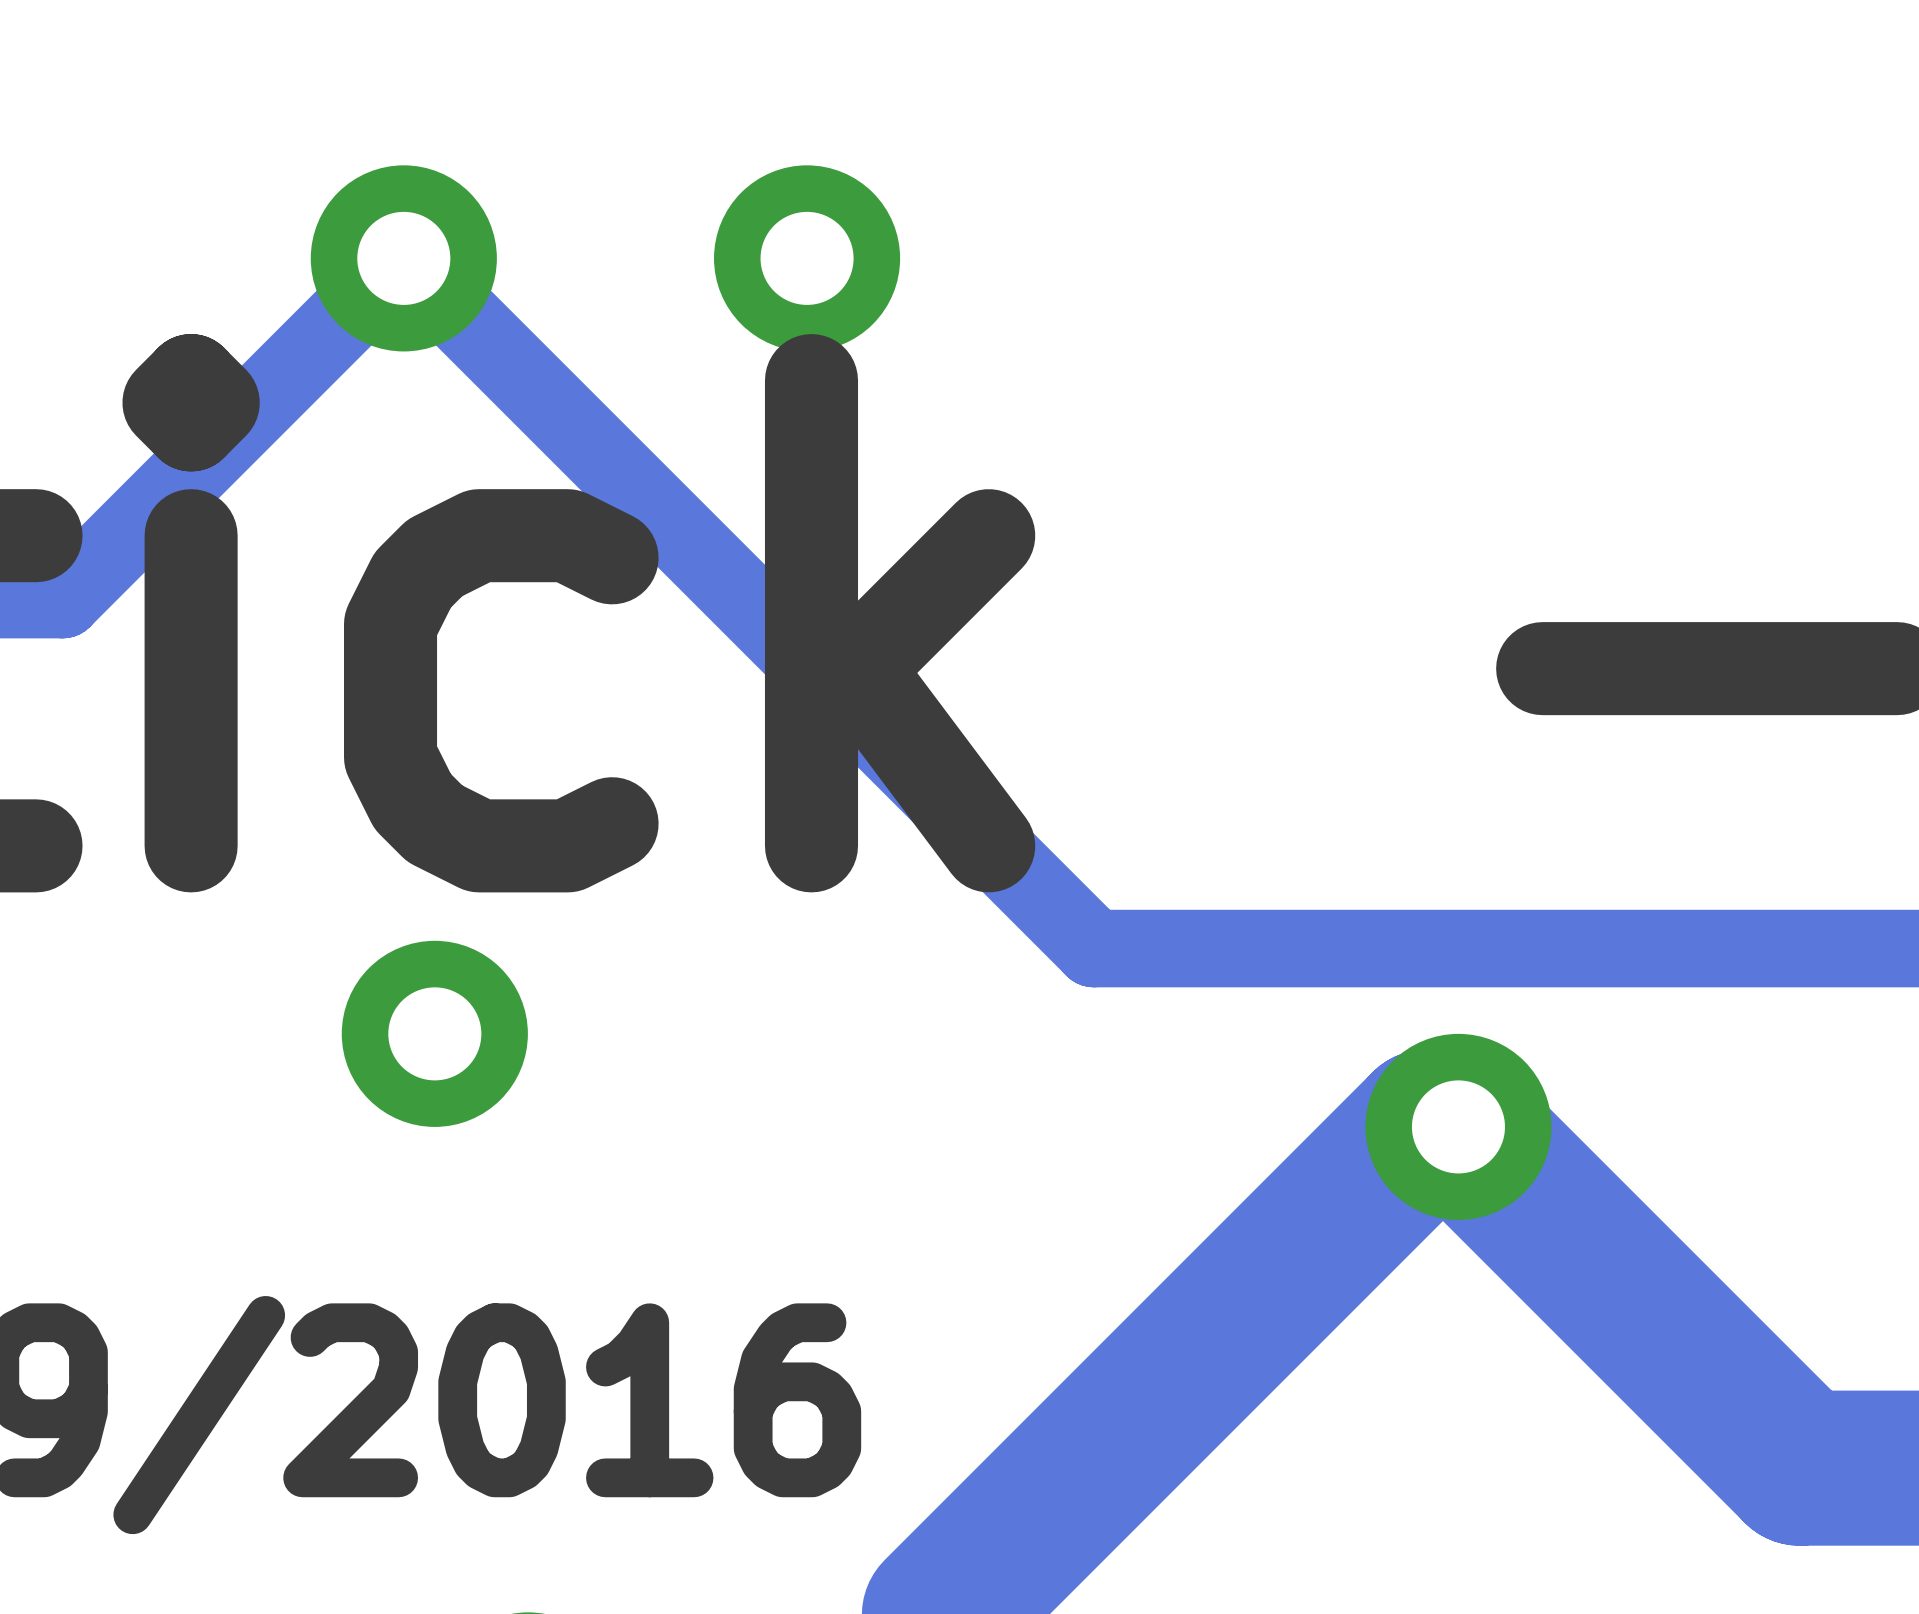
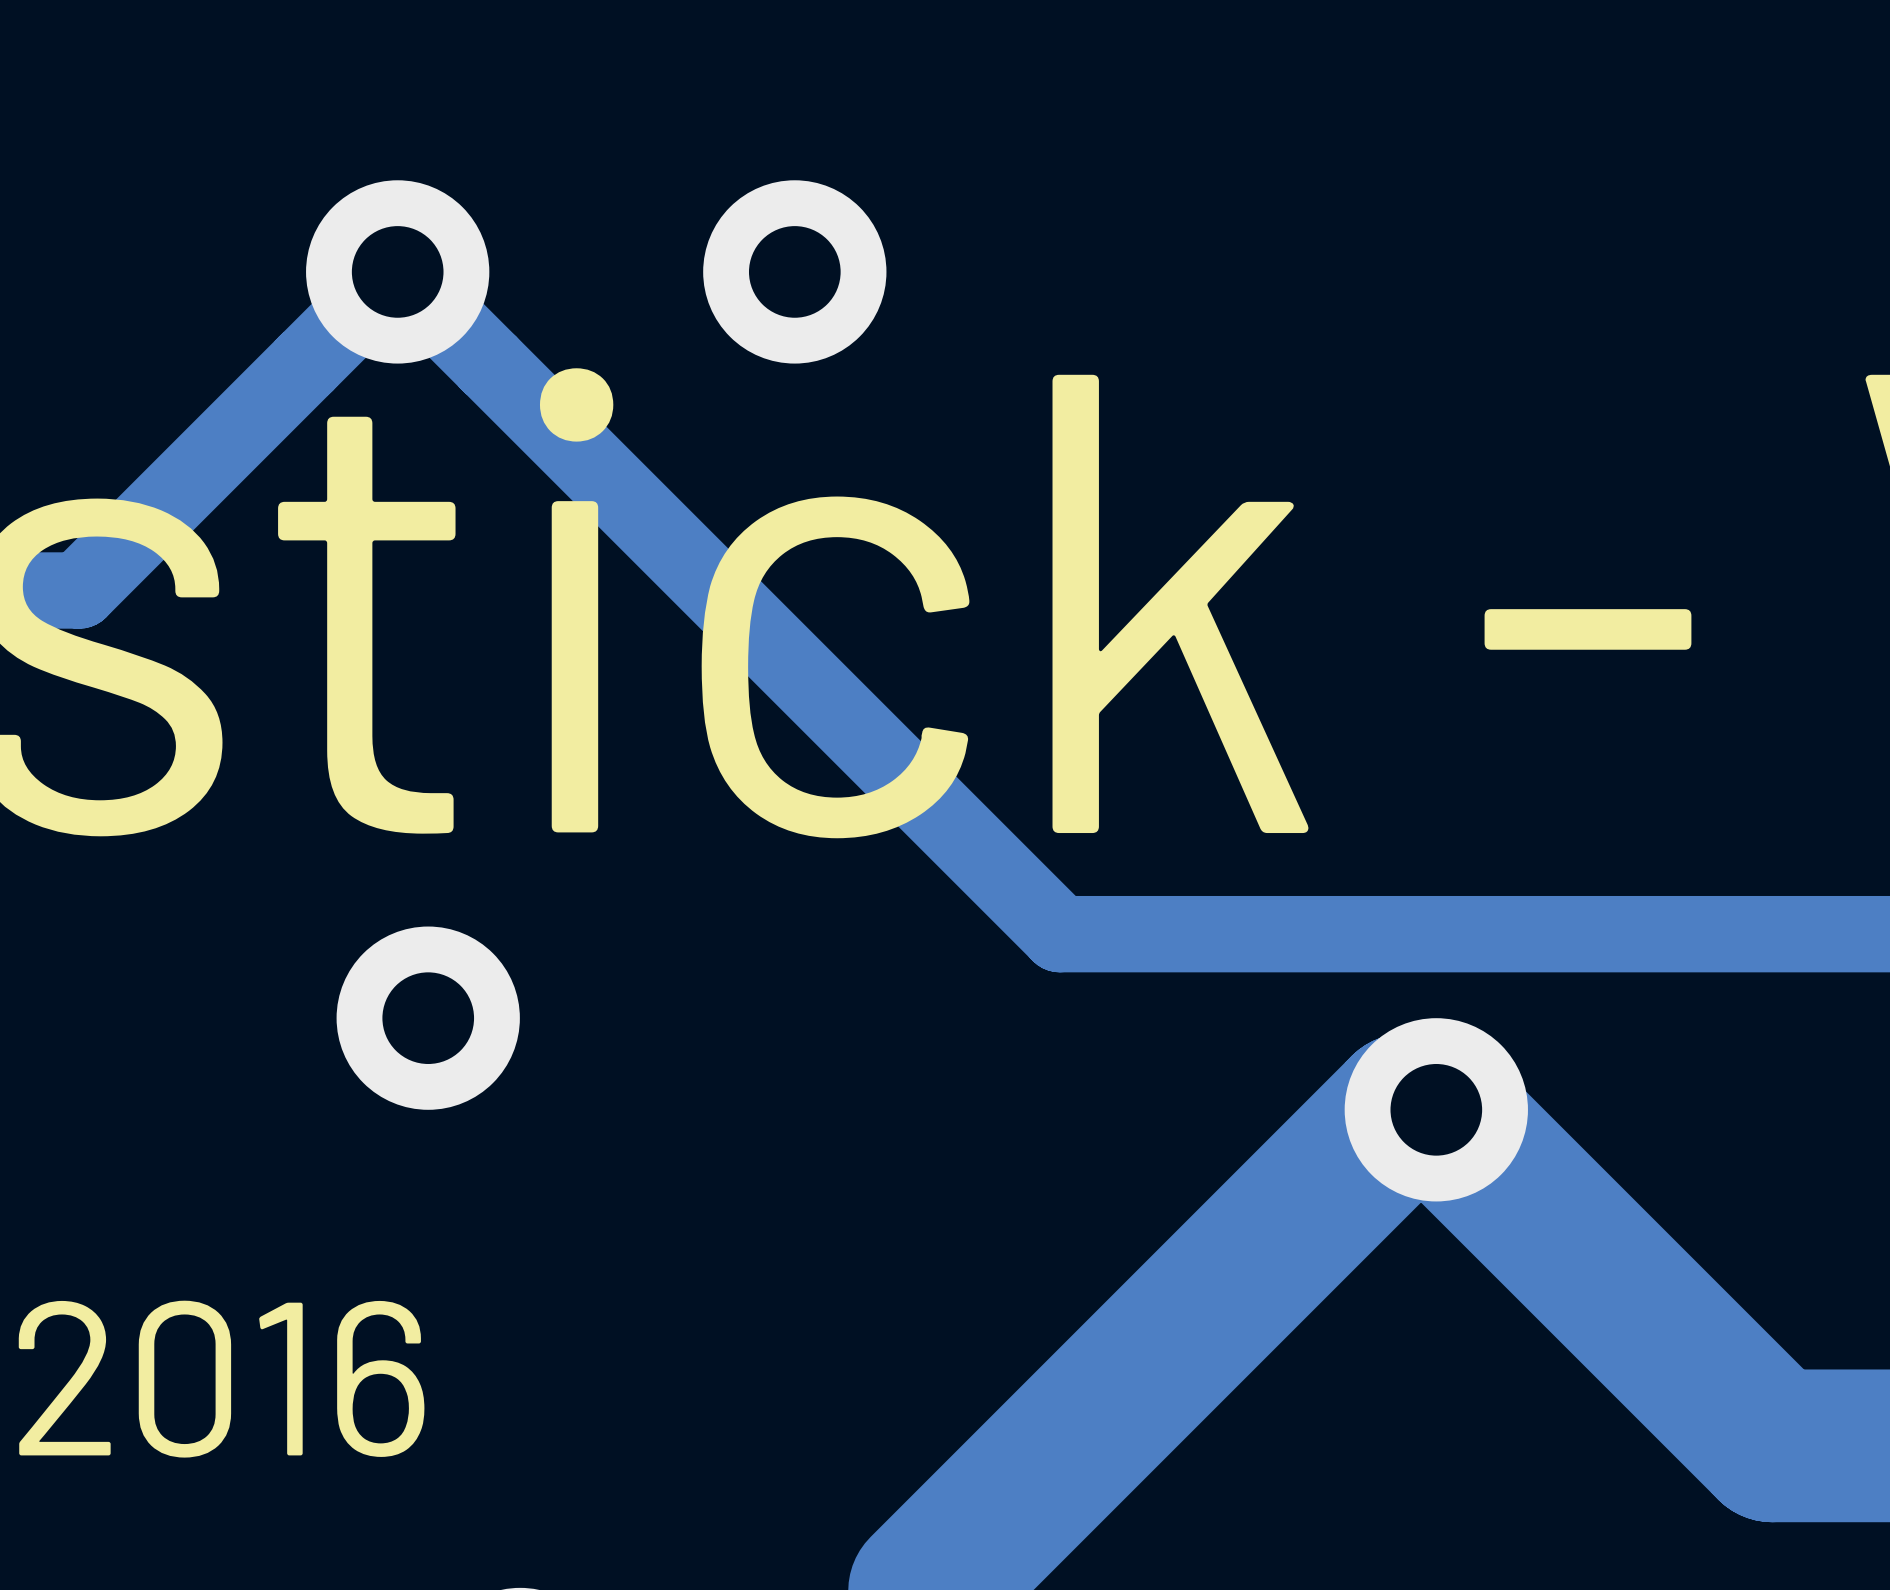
via position: (403, 258) -> (397, 271)
via position: (807, 258) -> (794, 271)
track: (62, 599) (403, 258) (1093, 948) -> (61, 590) (79, 590) (397, 271) (1059, 934) (1077, 934)

